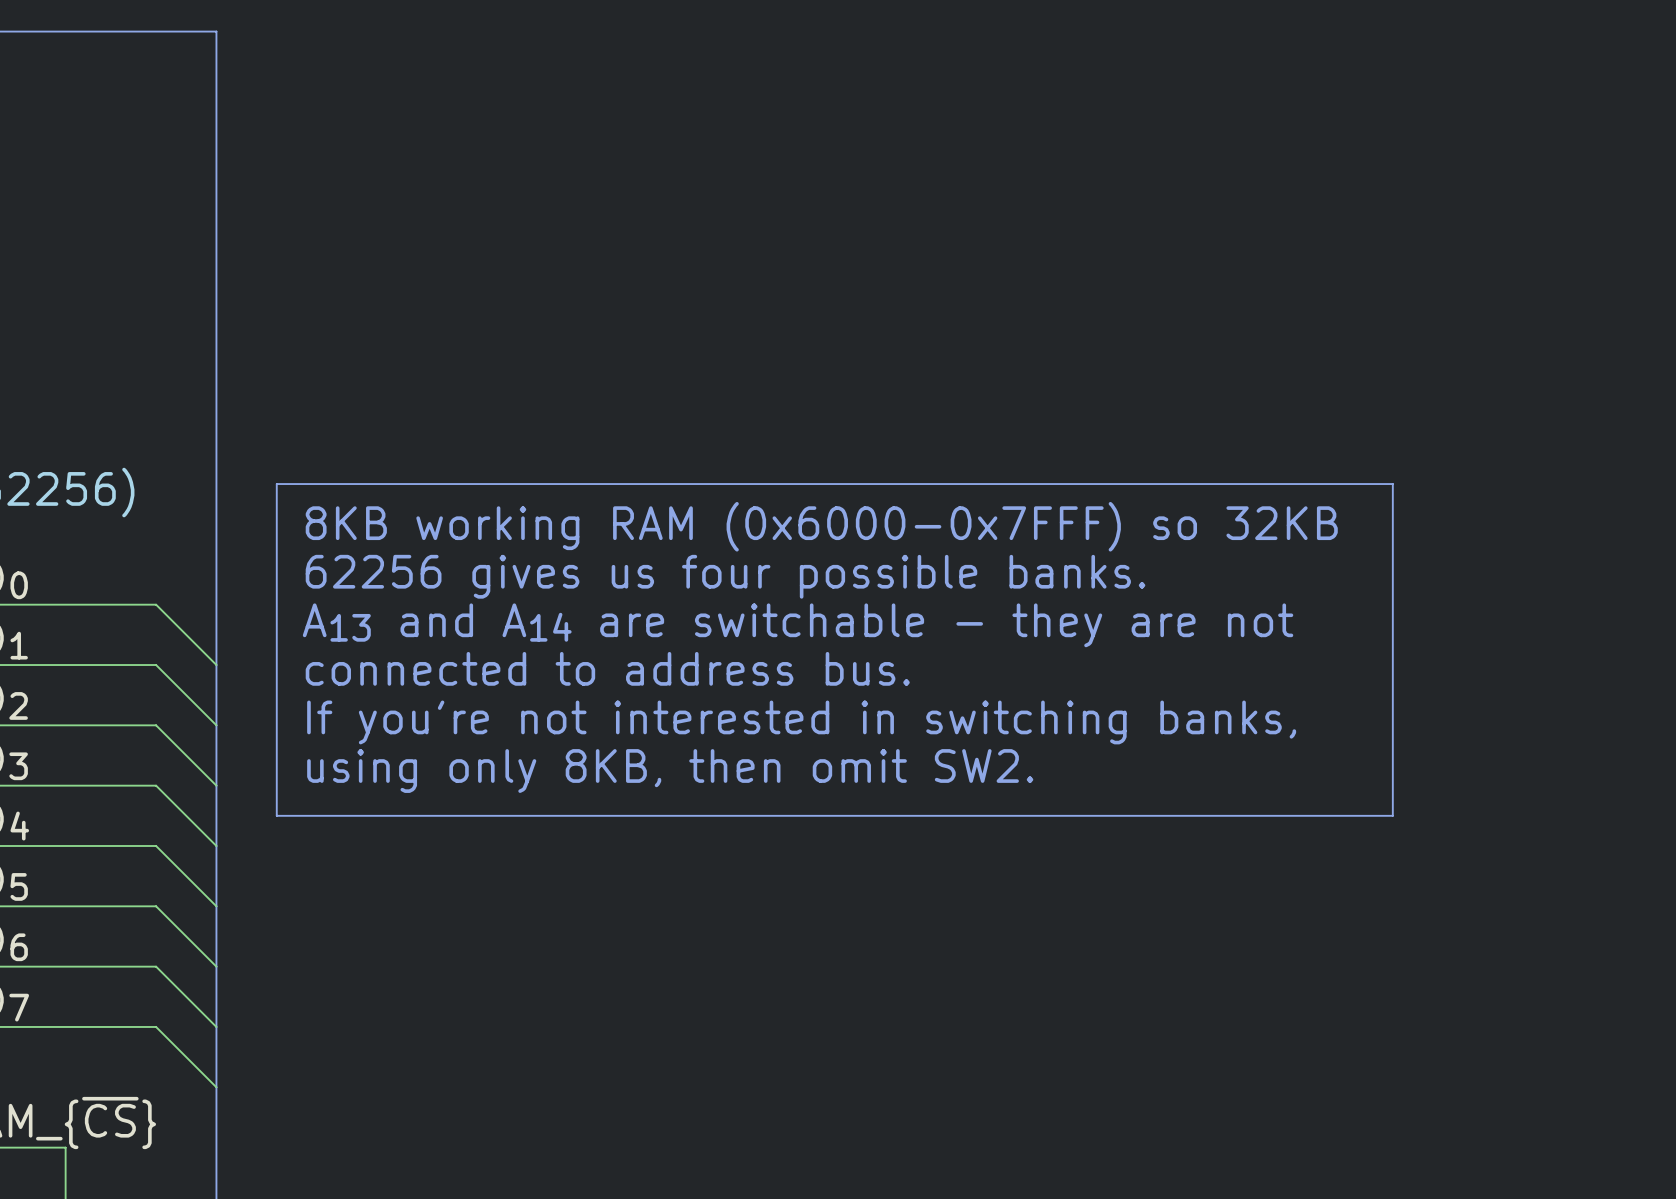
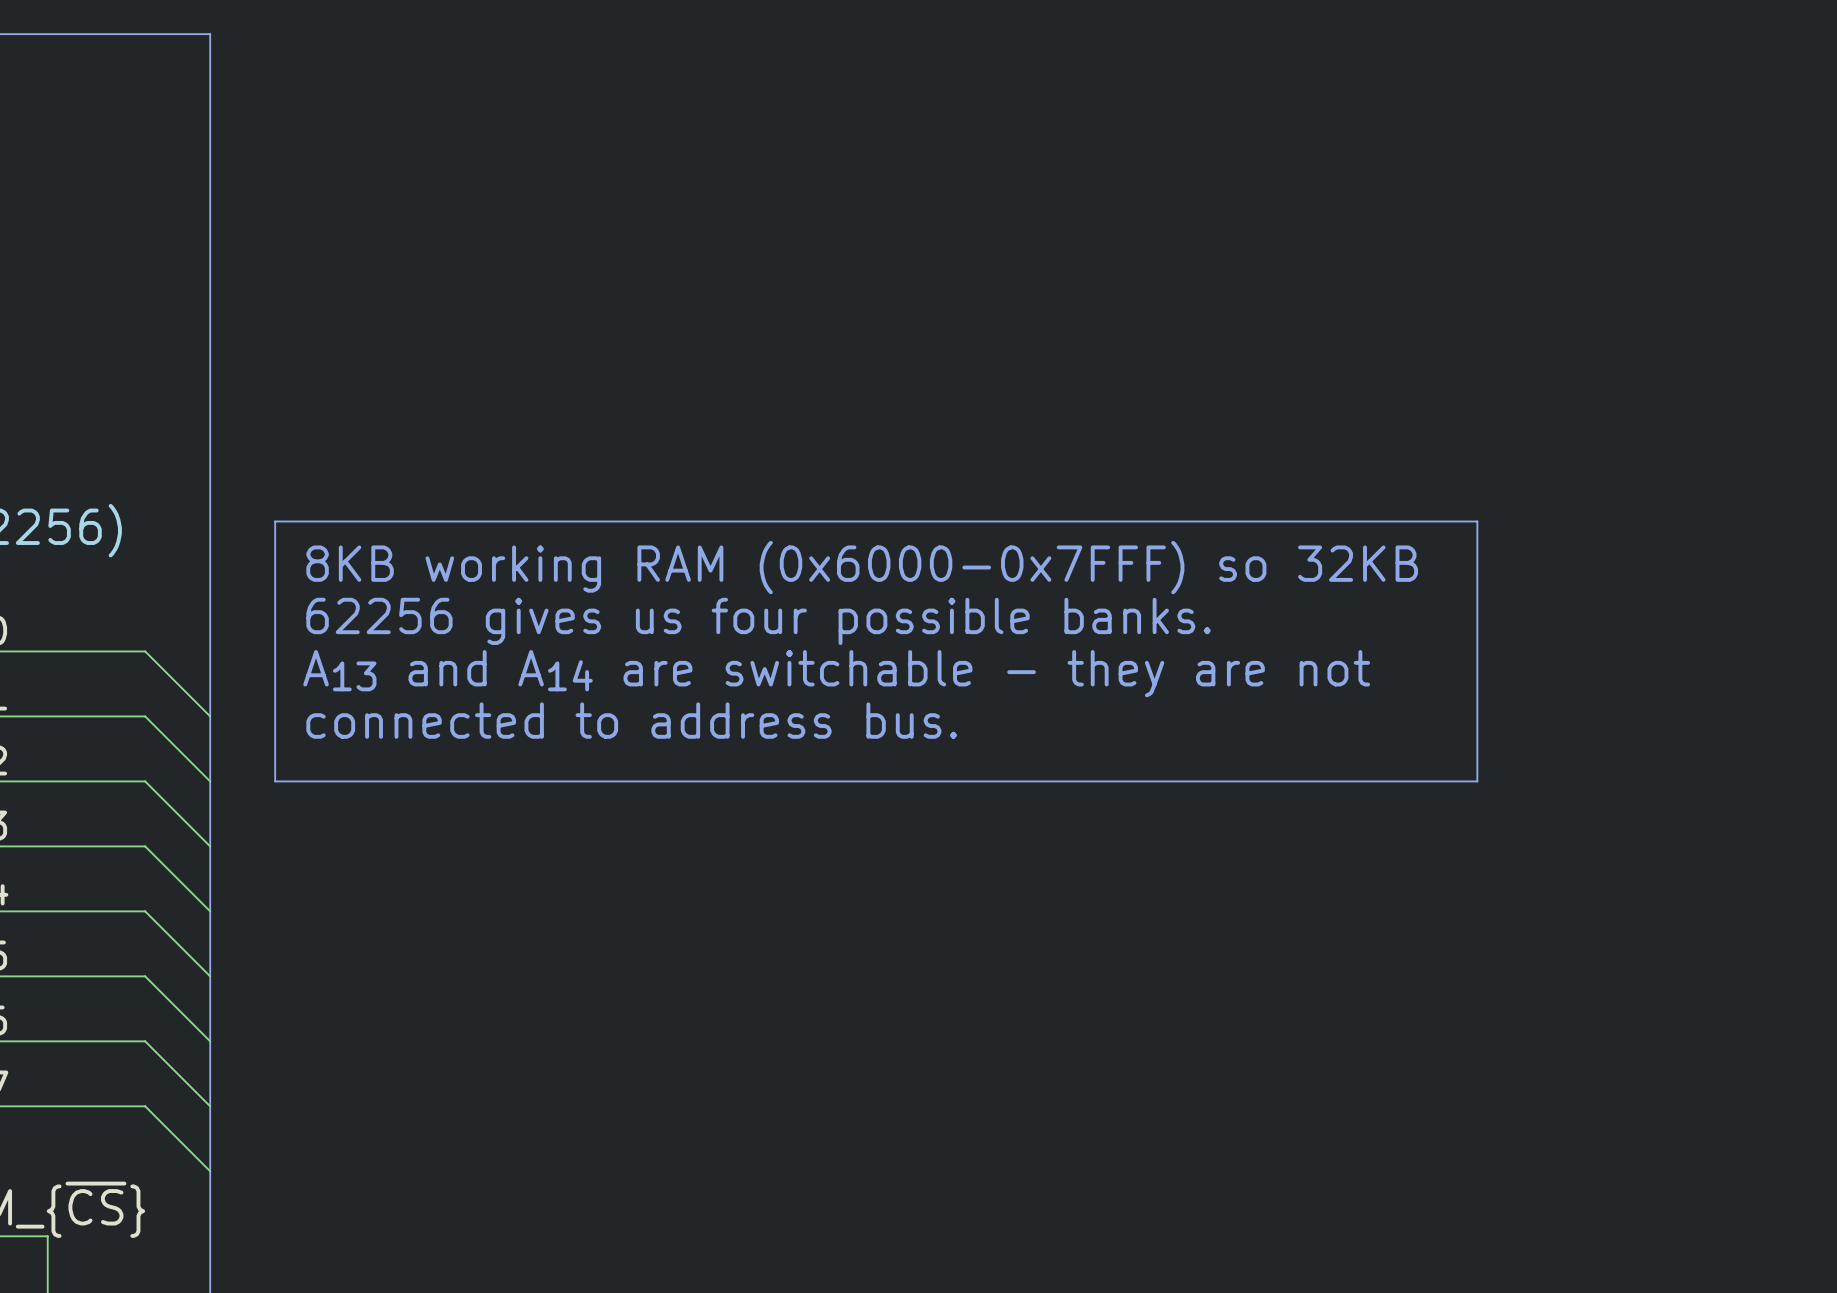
text: If you're not interested in switching banks, (801, 722) -> none
line: (276, 725) (276, 815) (1392, 815) (1392, 725) -> (275, 781) (1477, 781)
text: using only 8KB, then omit SW2. (670, 771) -> none

